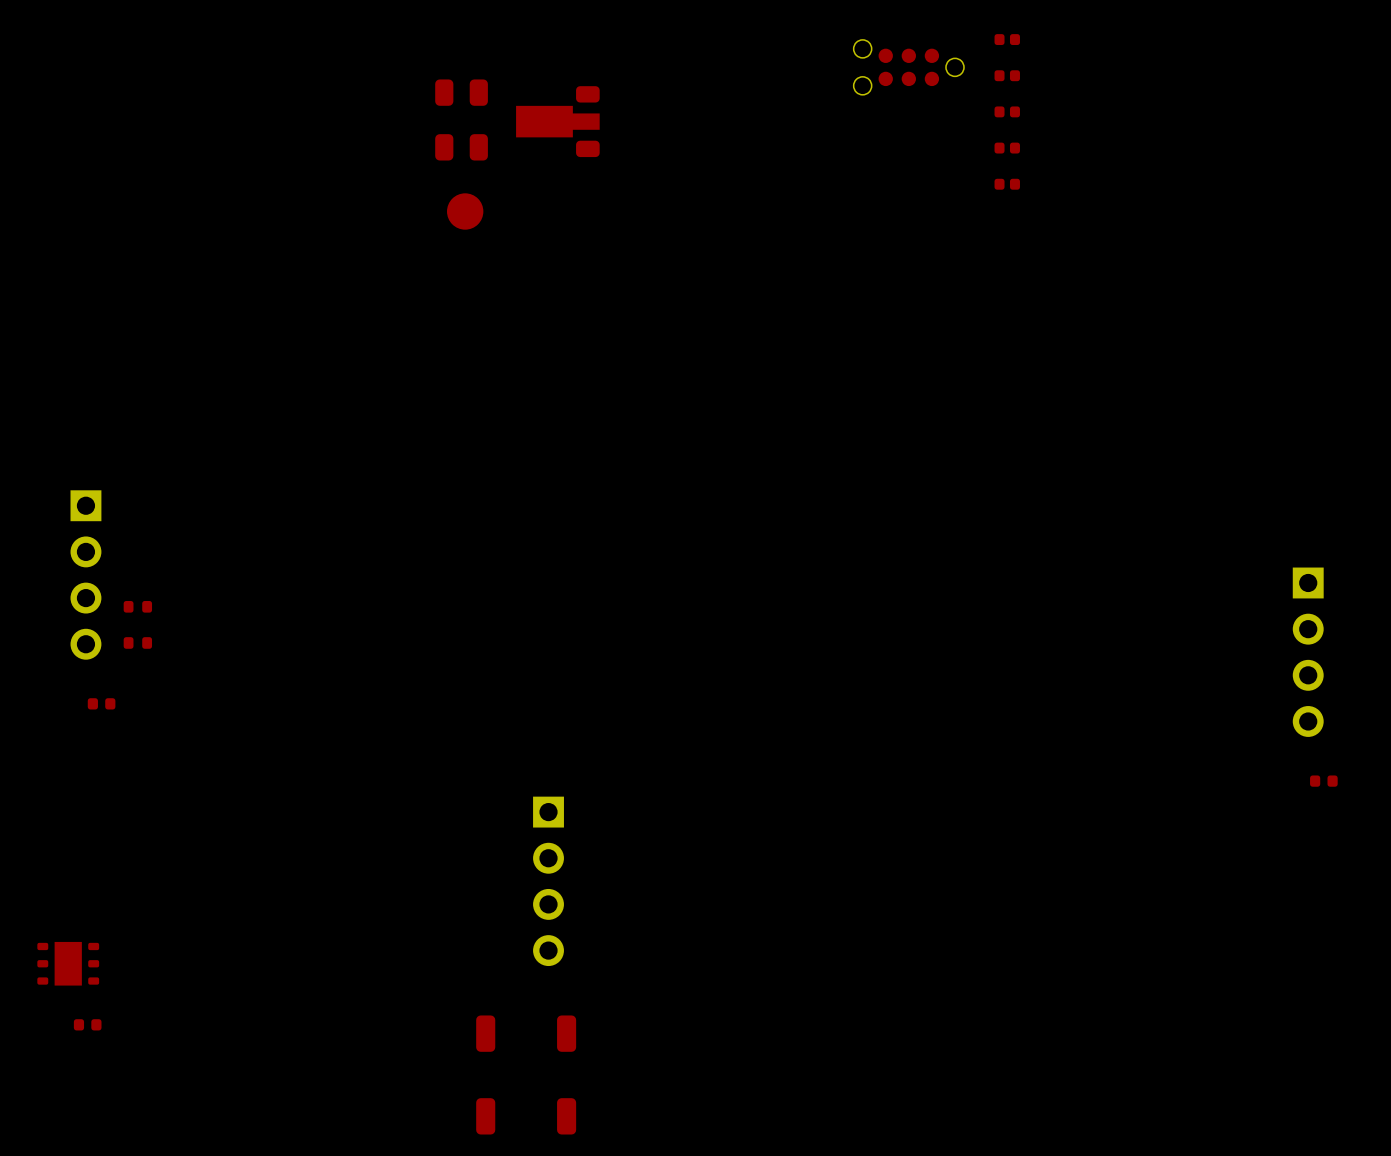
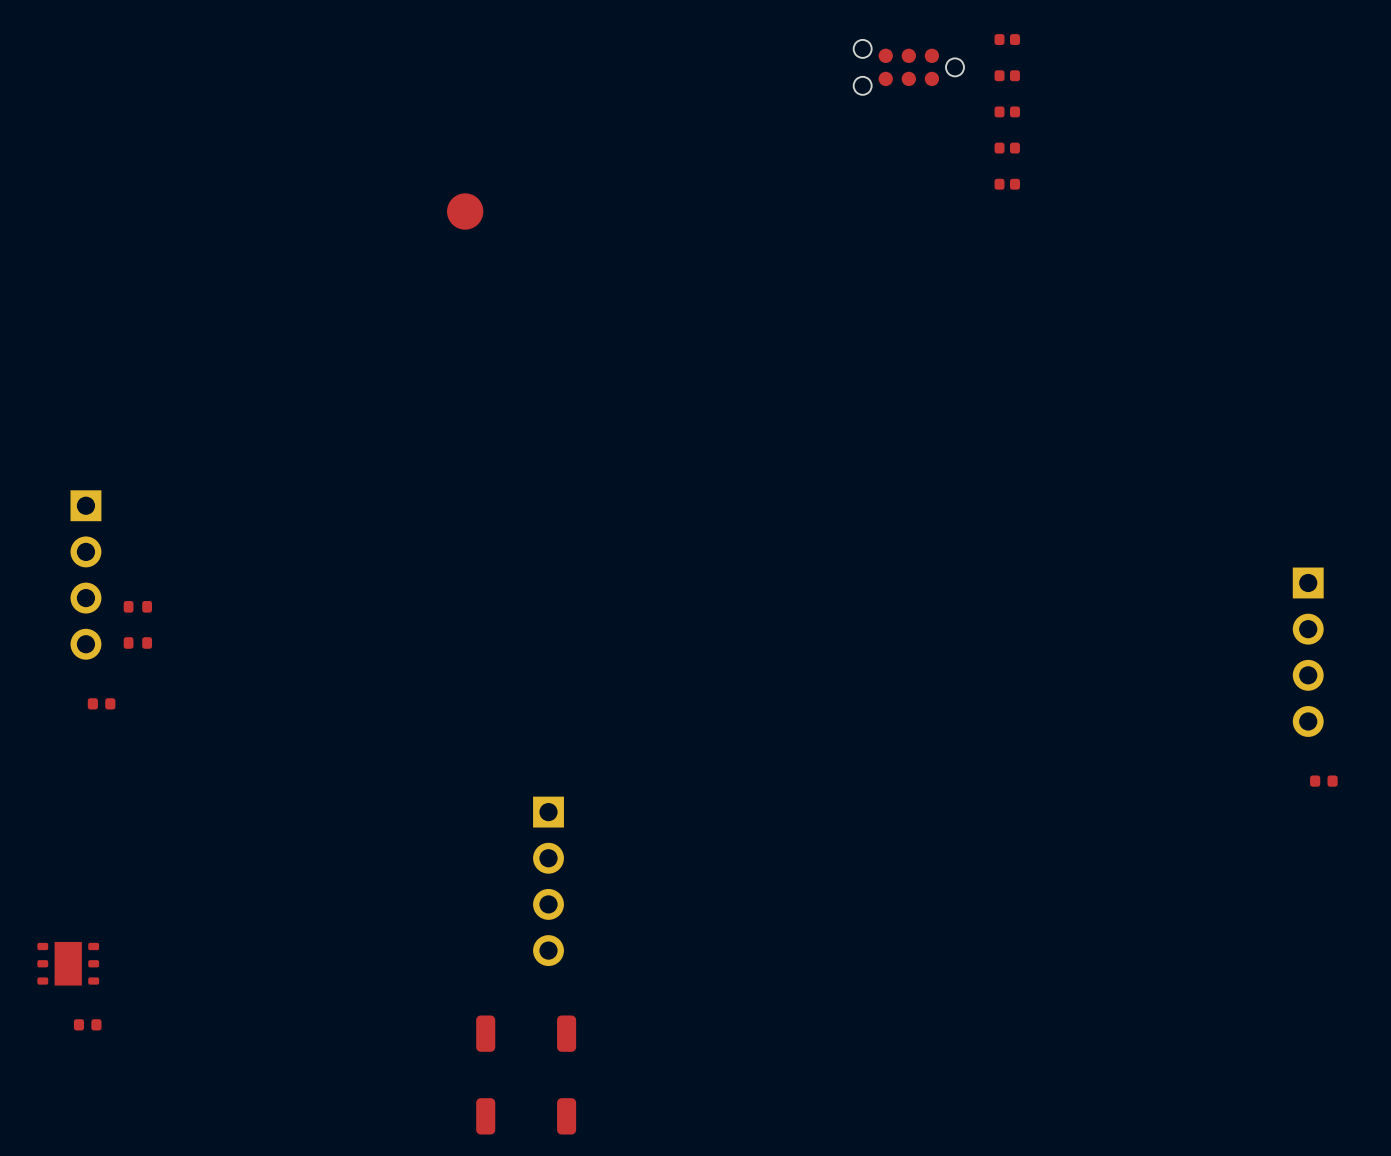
part: (461, 92) -> none
part: (557, 121) -> none
part: (461, 147) -> none

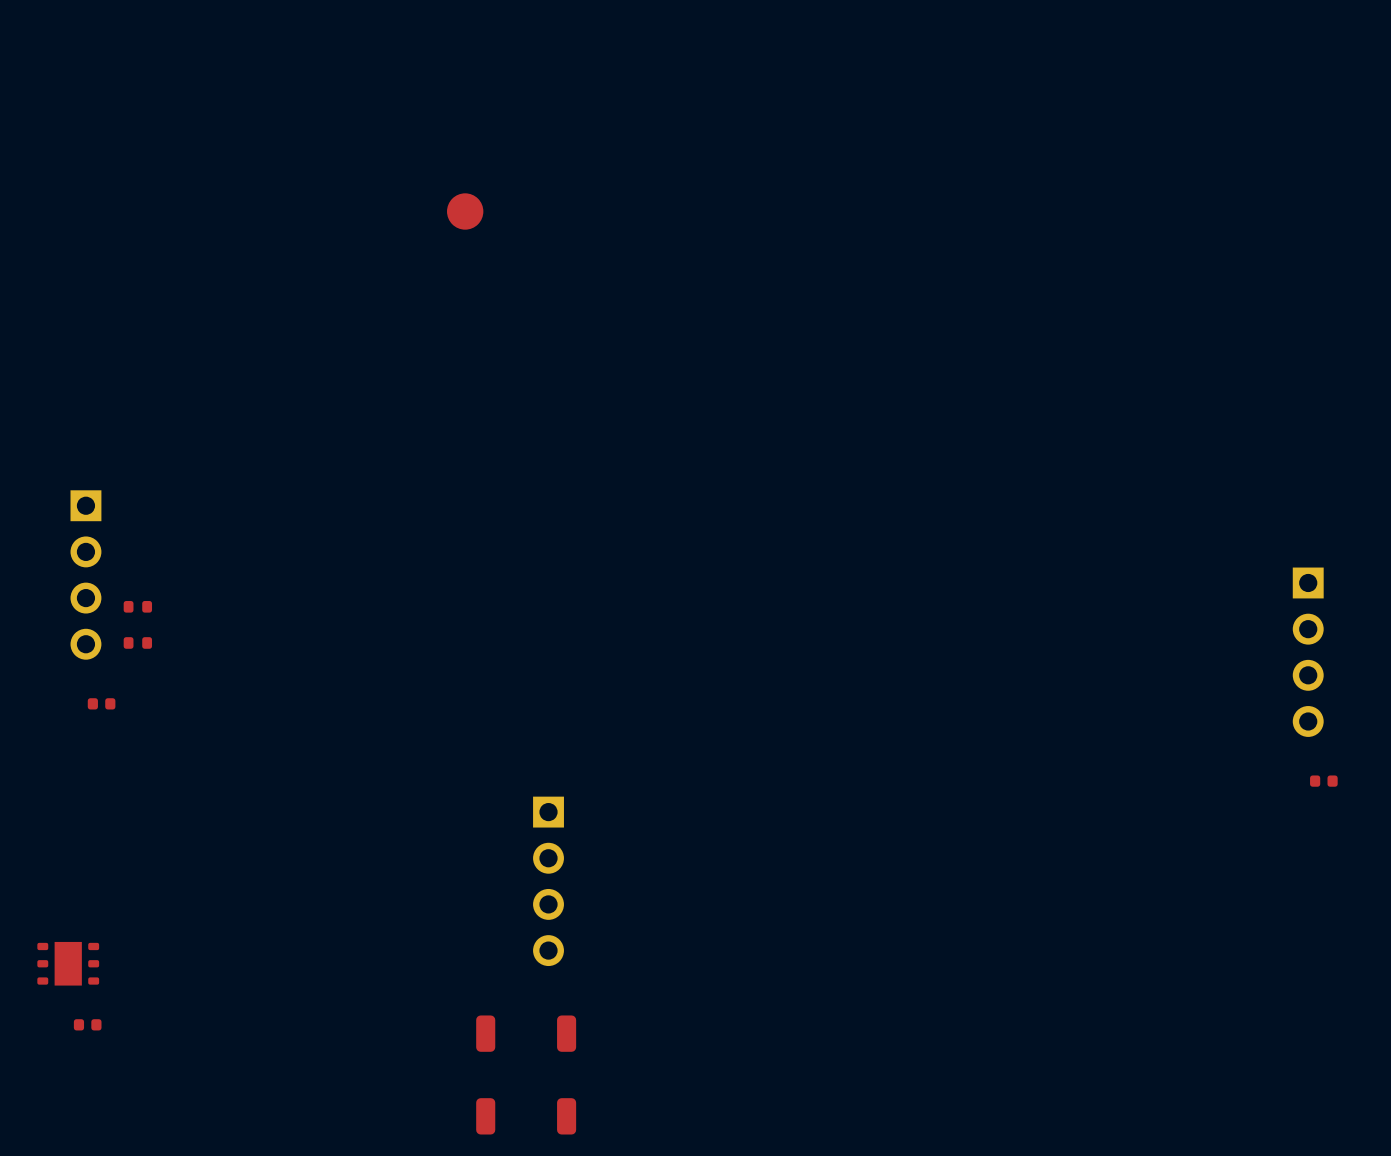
part: (1007, 39) -> none
part: (908, 67) -> none
part: (1007, 75) -> none
part: (1007, 111) -> none
part: (1007, 148) -> none
part: (1007, 184) -> none

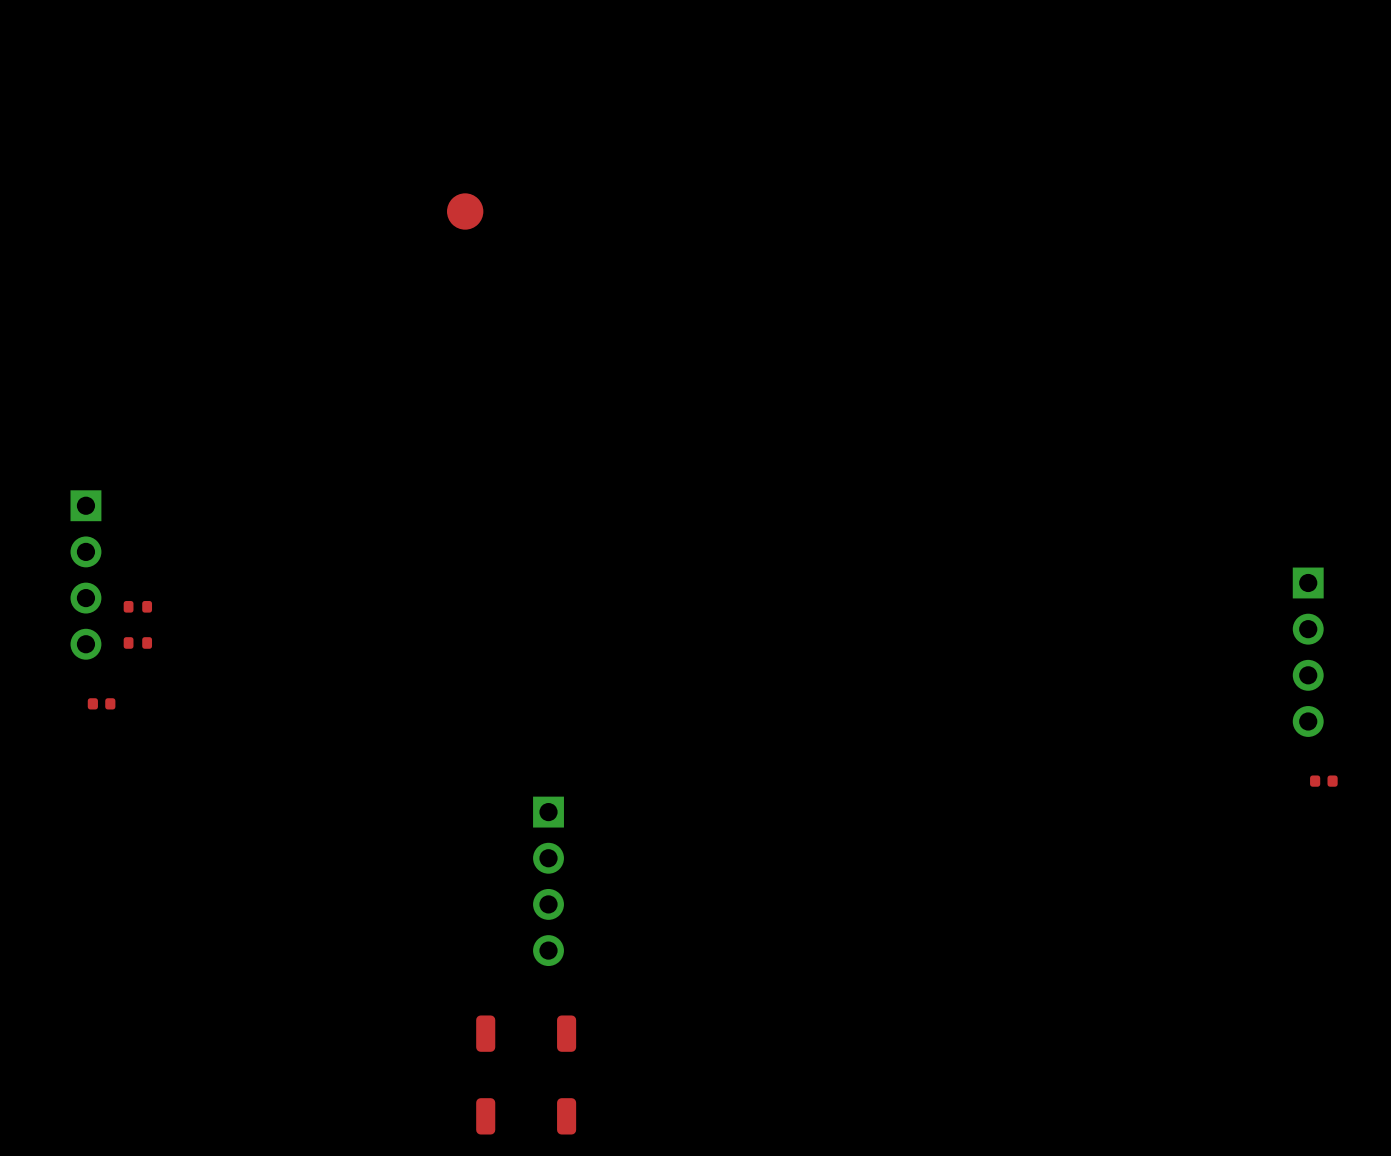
part: (68, 963) -> none
part: (87, 1024) -> none

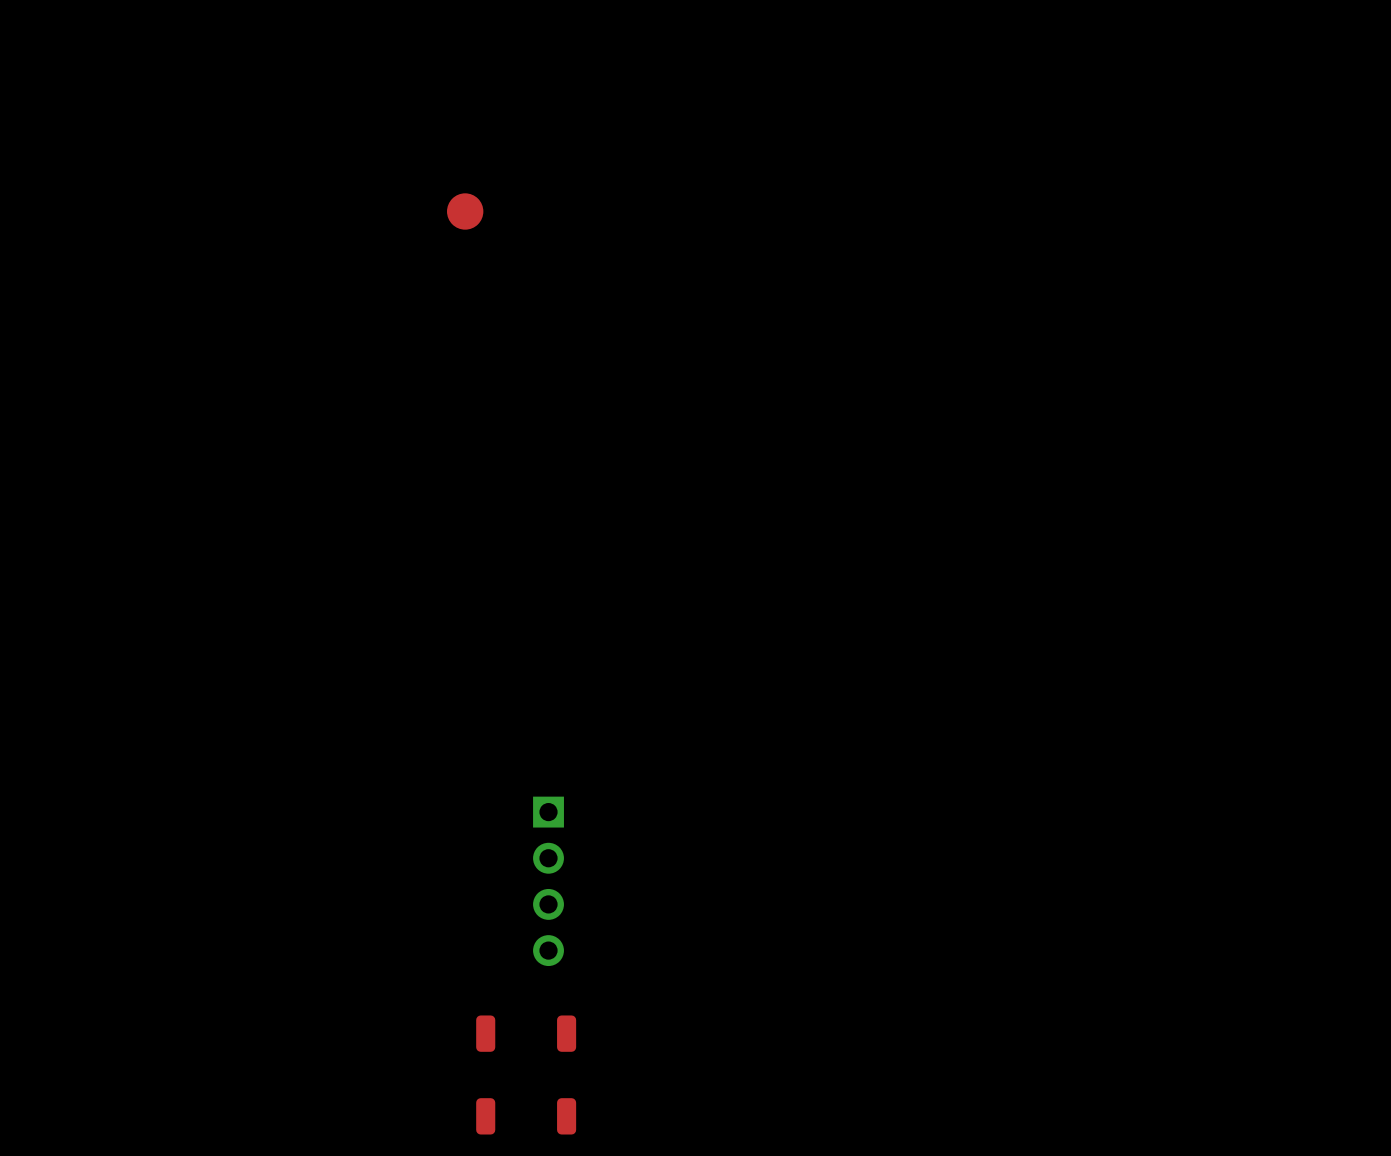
part: (85, 574) -> none
part: (137, 606) -> none
part: (137, 642) -> none
part: (1308, 652) -> none
part: (101, 703) -> none
part: (1323, 781) -> none

